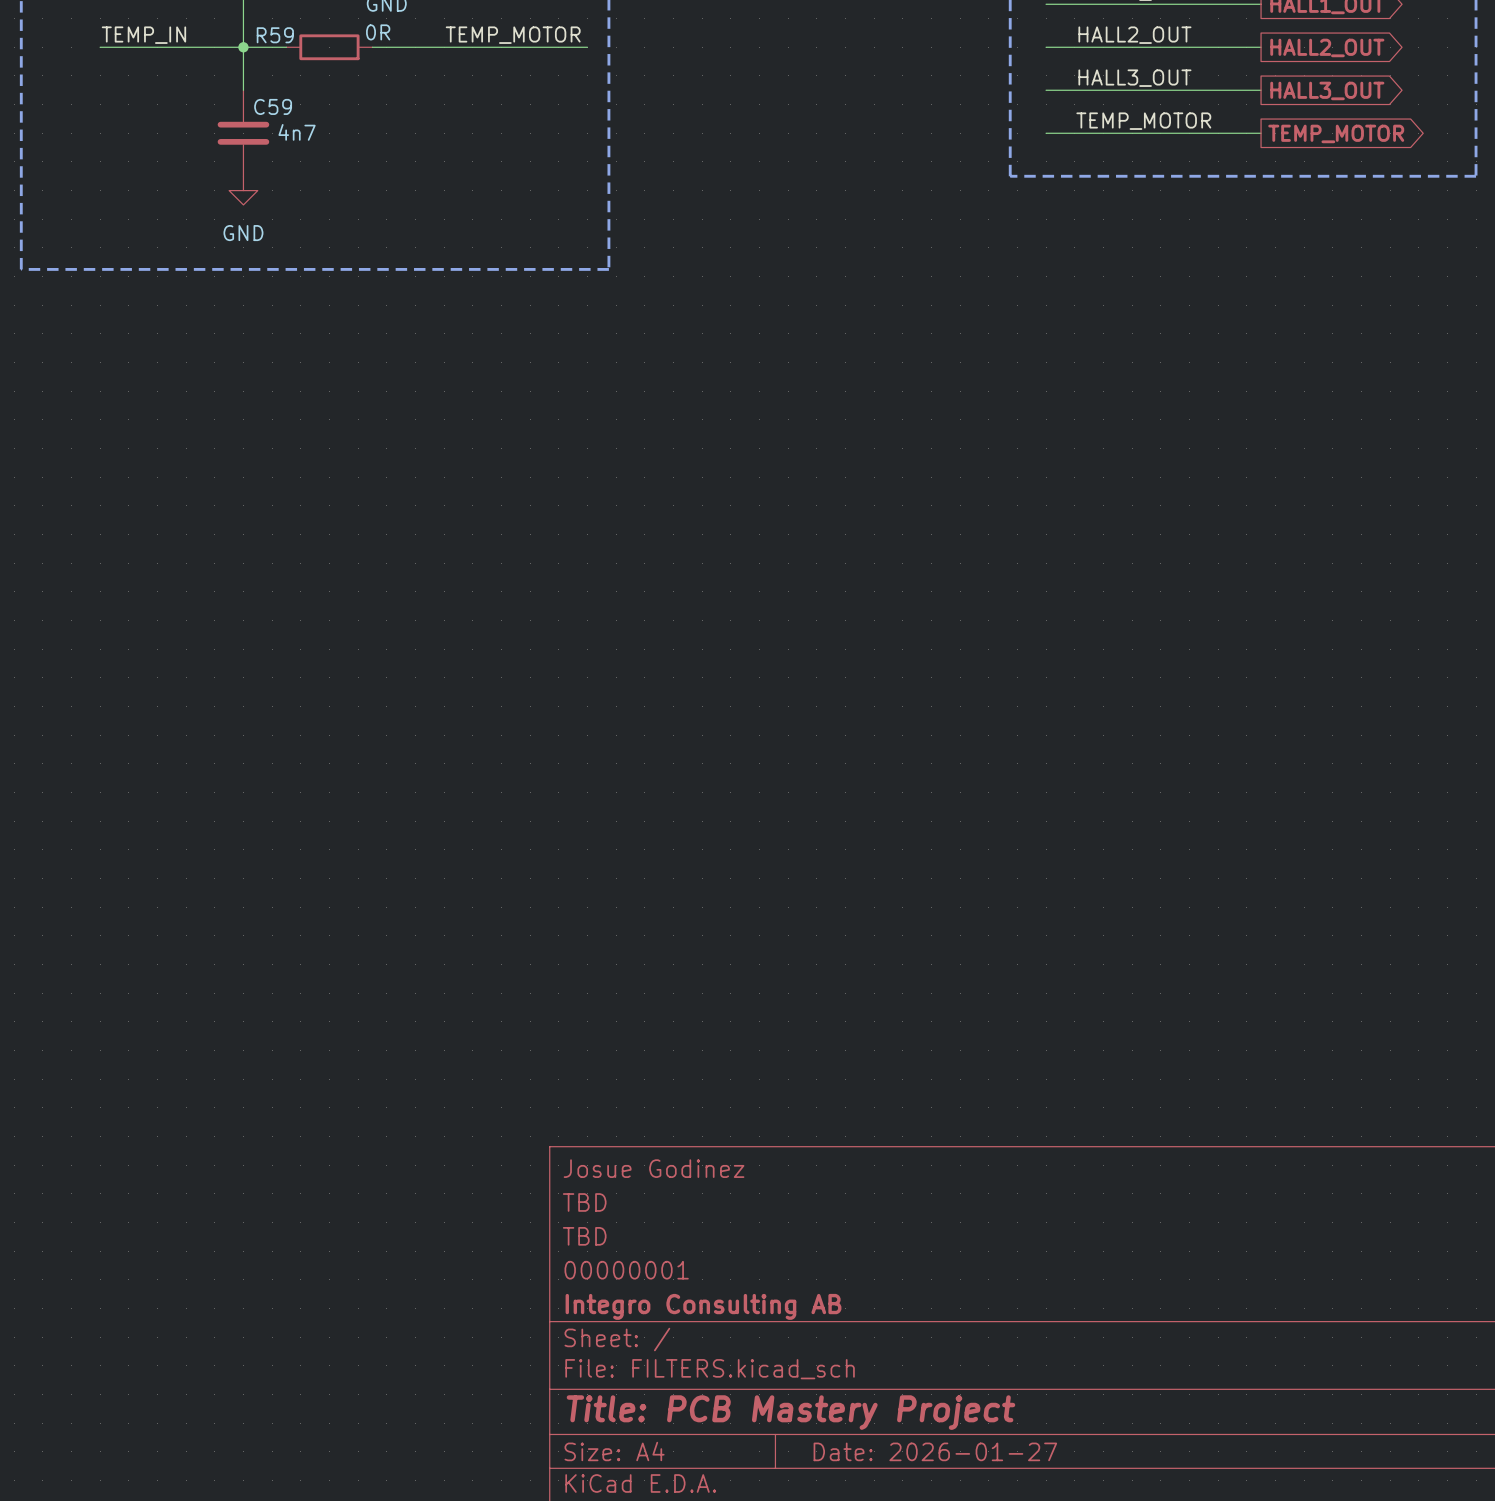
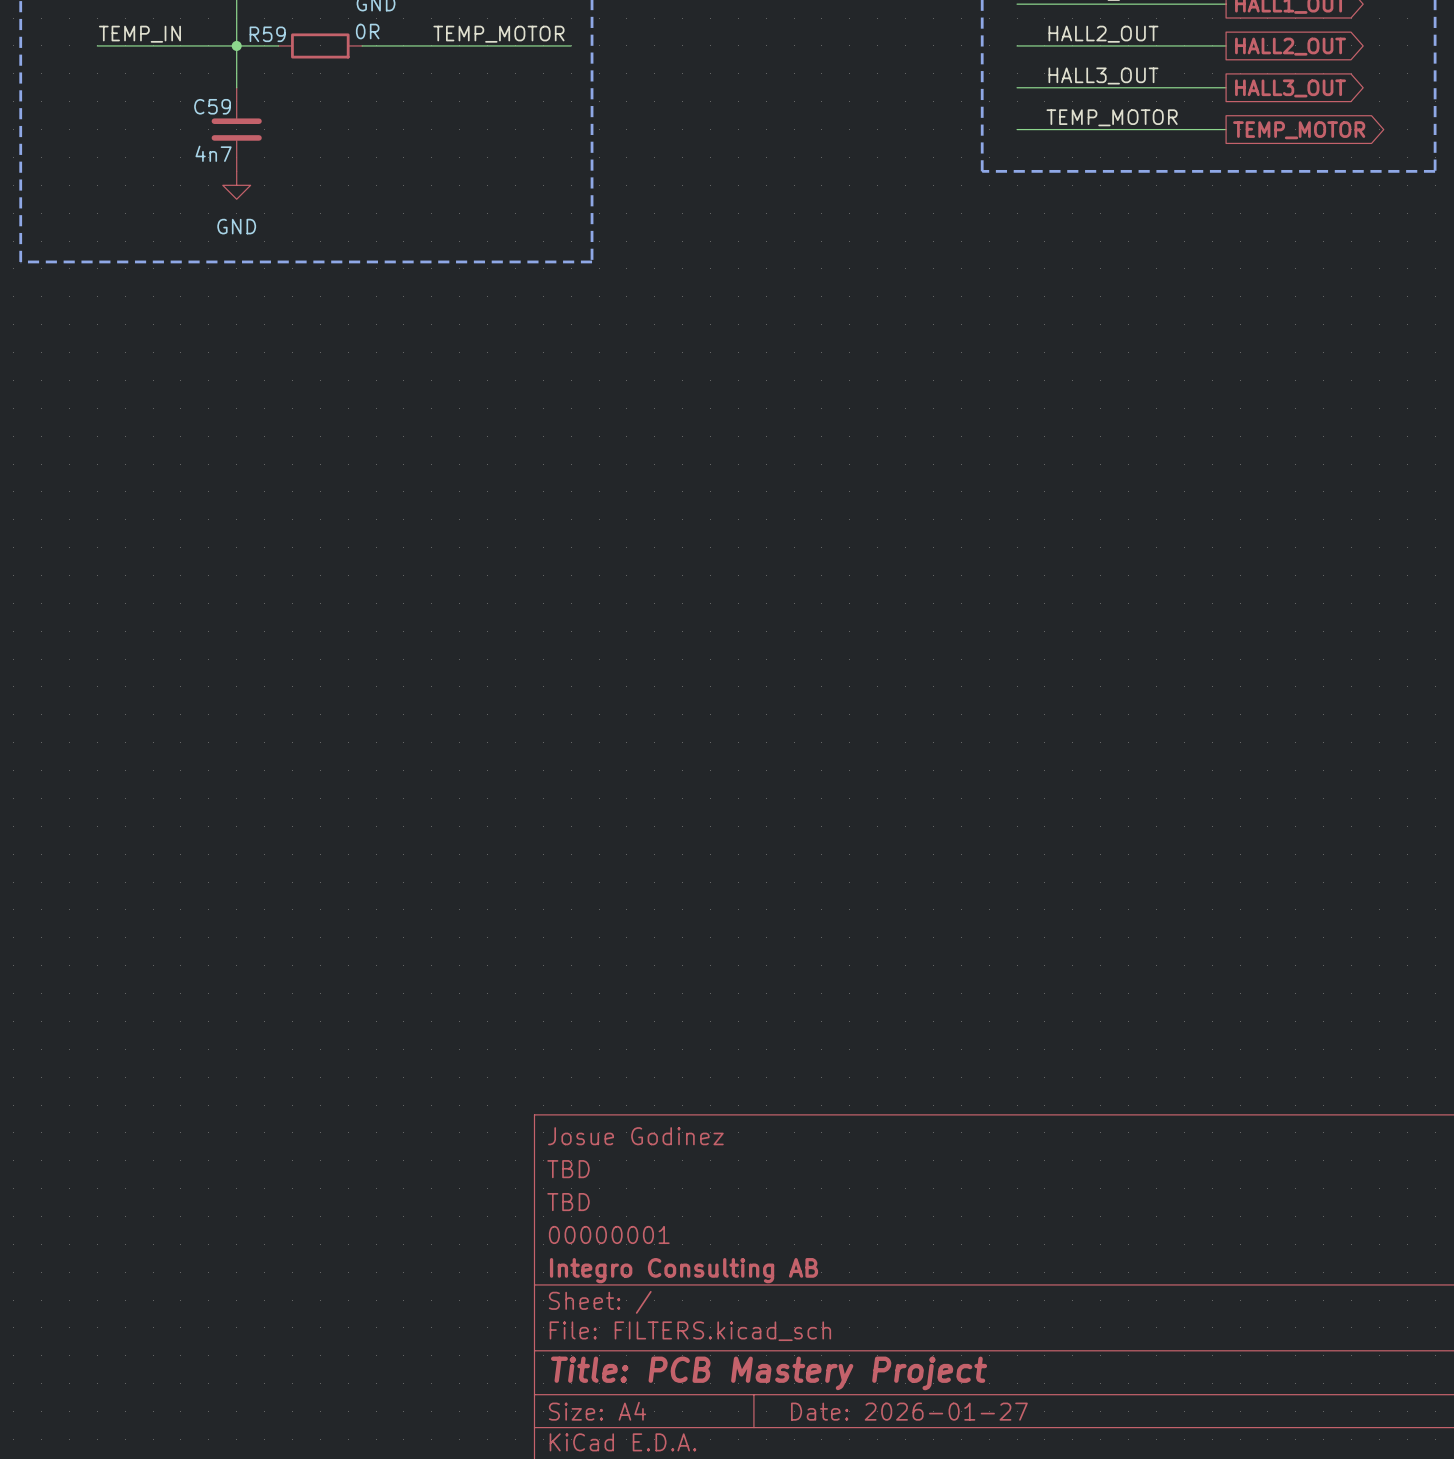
C59 name position: C59 (273, 106) -> C59 (212, 106)
C59 value position: 4n7 (297, 132) -> 4n7 (213, 153)

